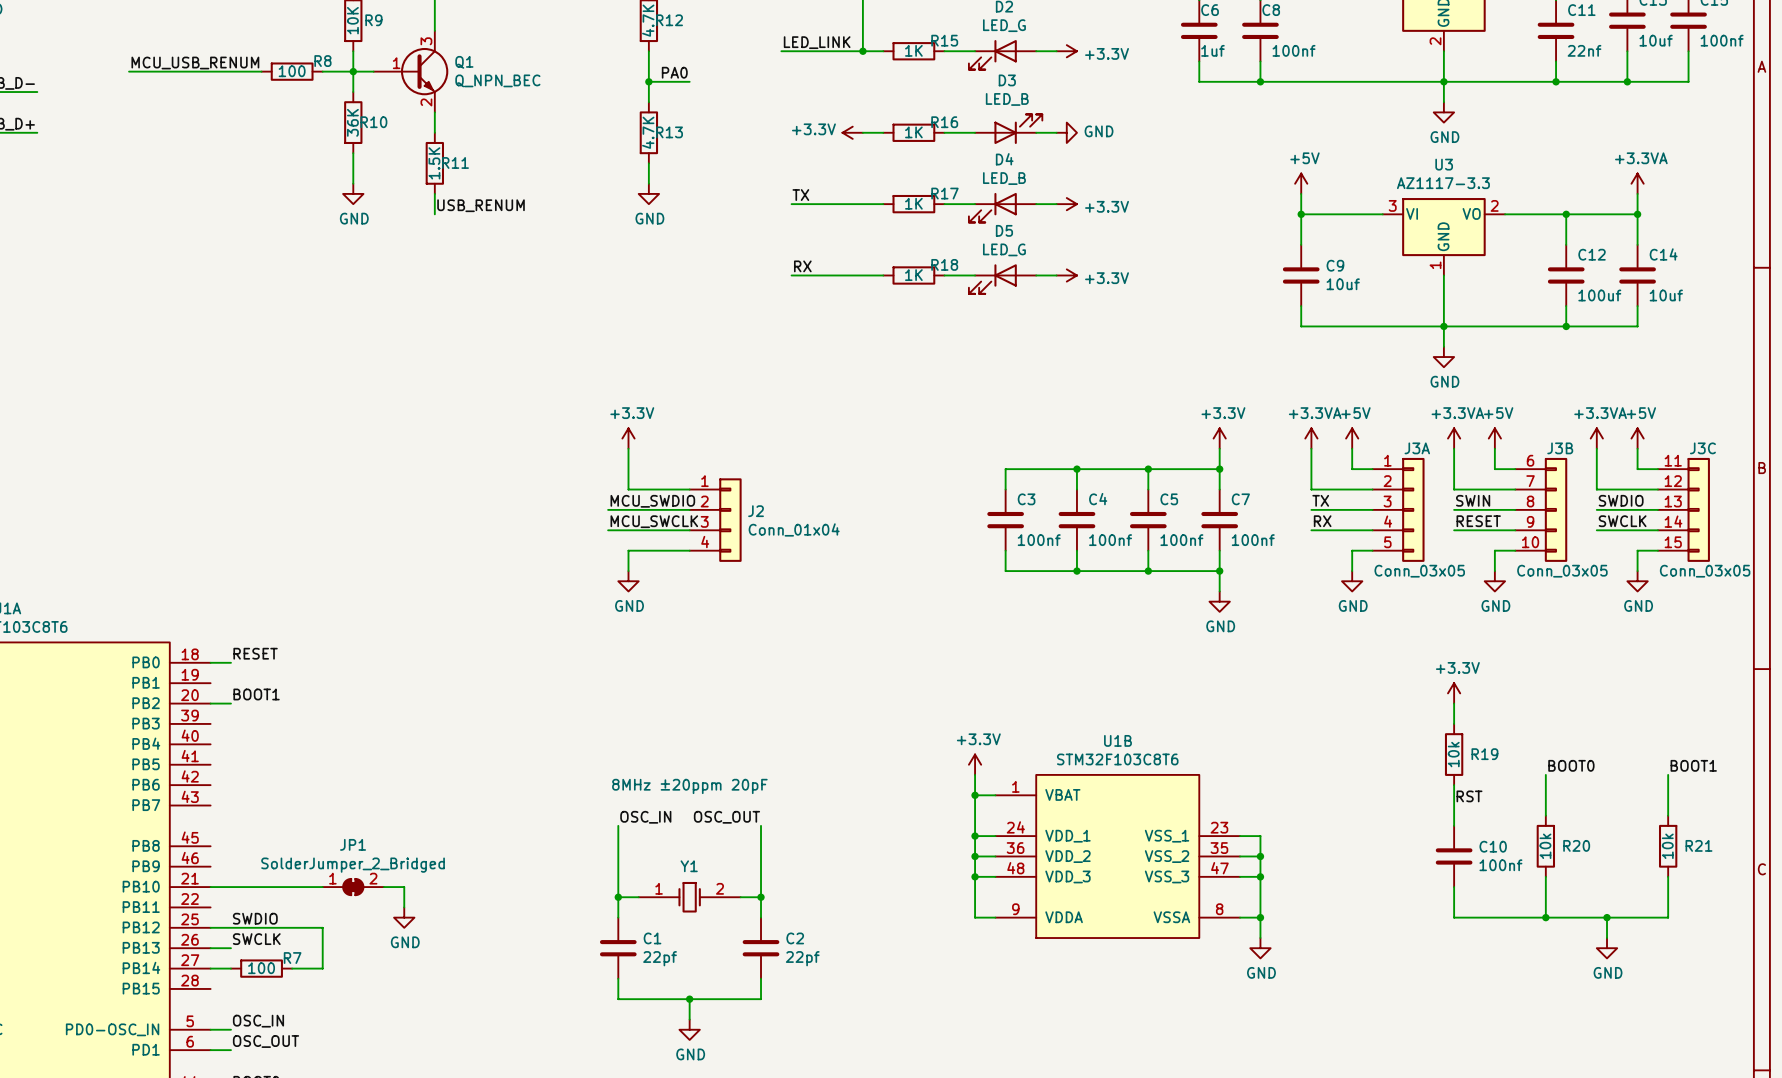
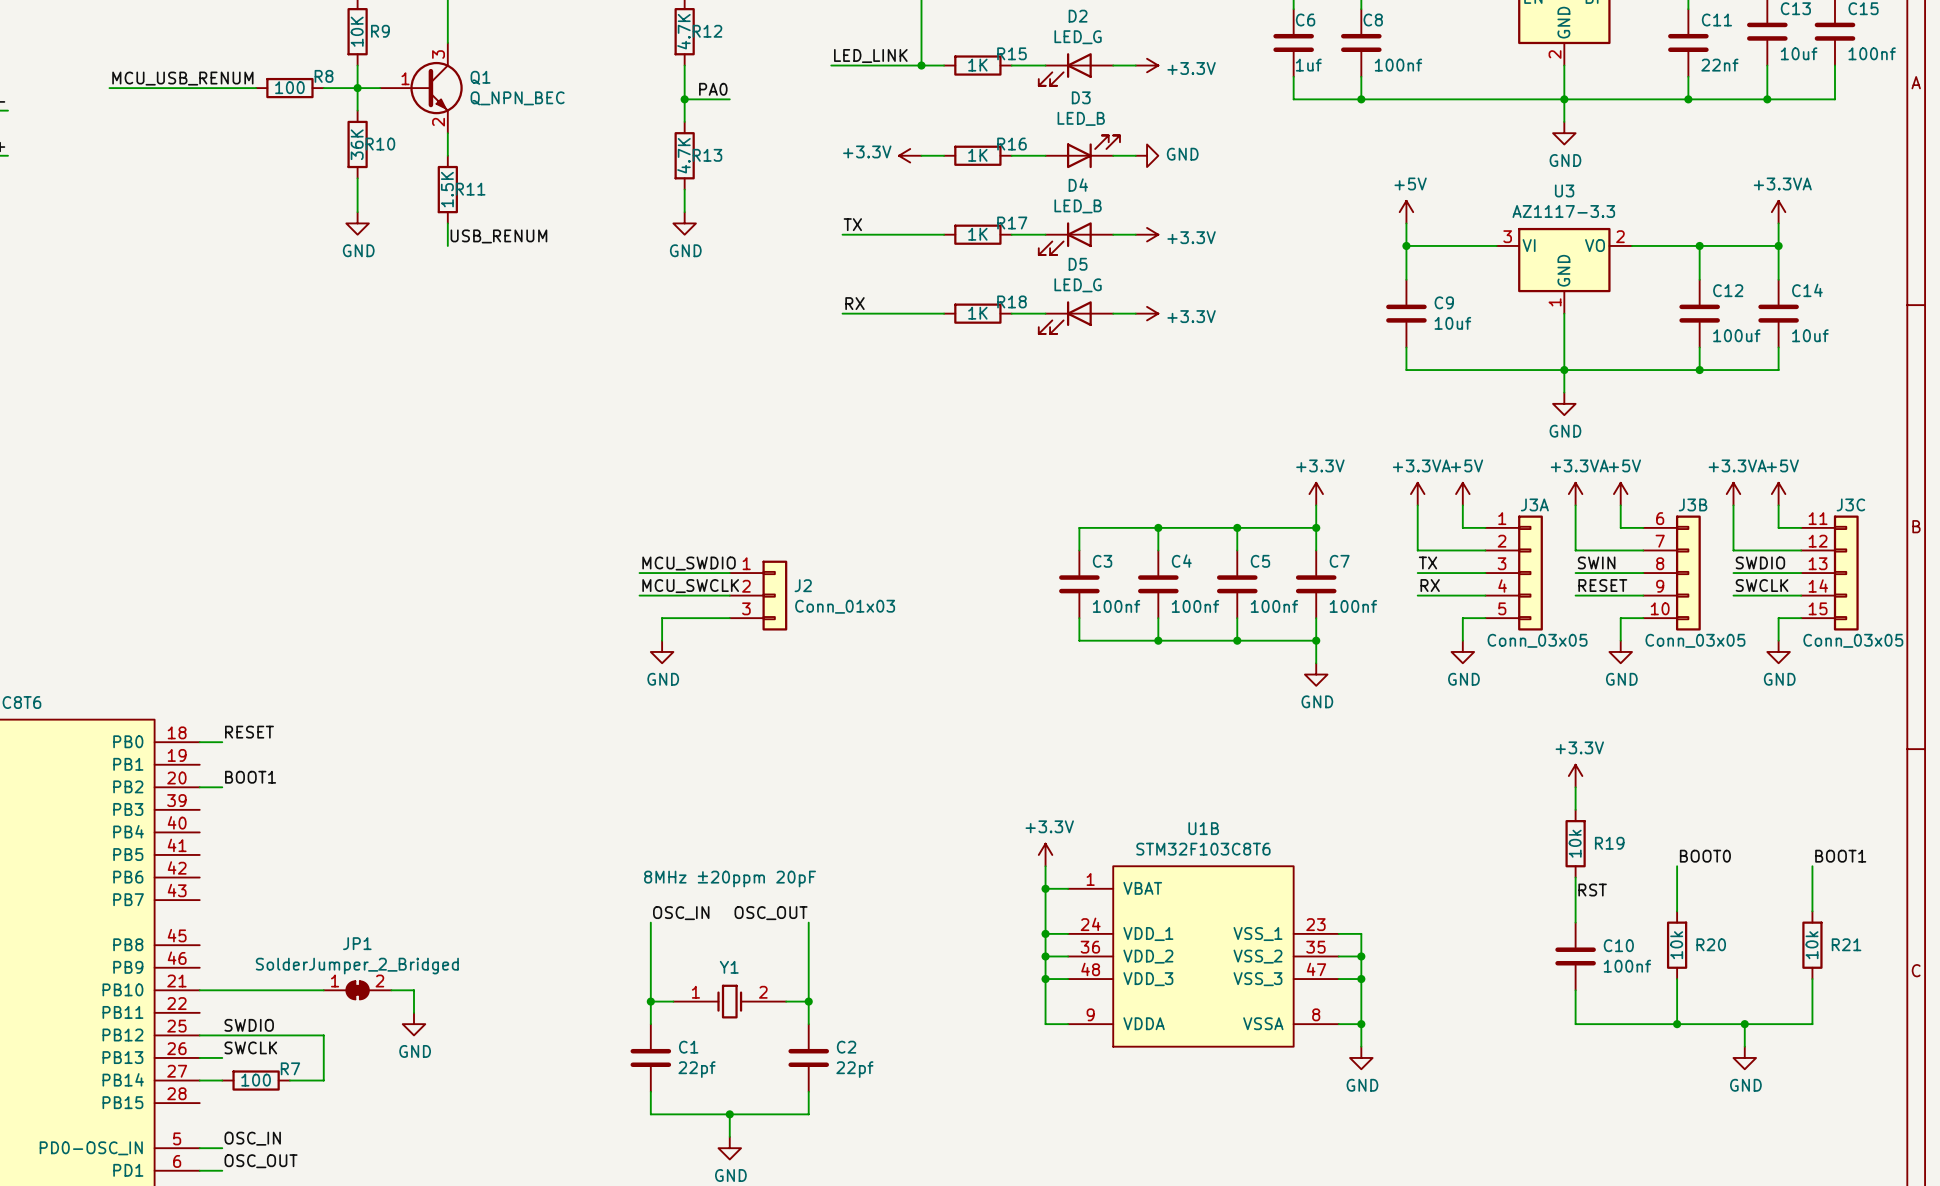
power symbol: +3.3V (628, 438) -> none
wire: (628, 448) (628, 489) (689, 489) -> none
J2 symbol: [689, 478, 742, 562] -> [729, 560, 788, 631]
J2 value: Conn_01x04 (794, 529) -> Conn_01x03 (845, 606)

